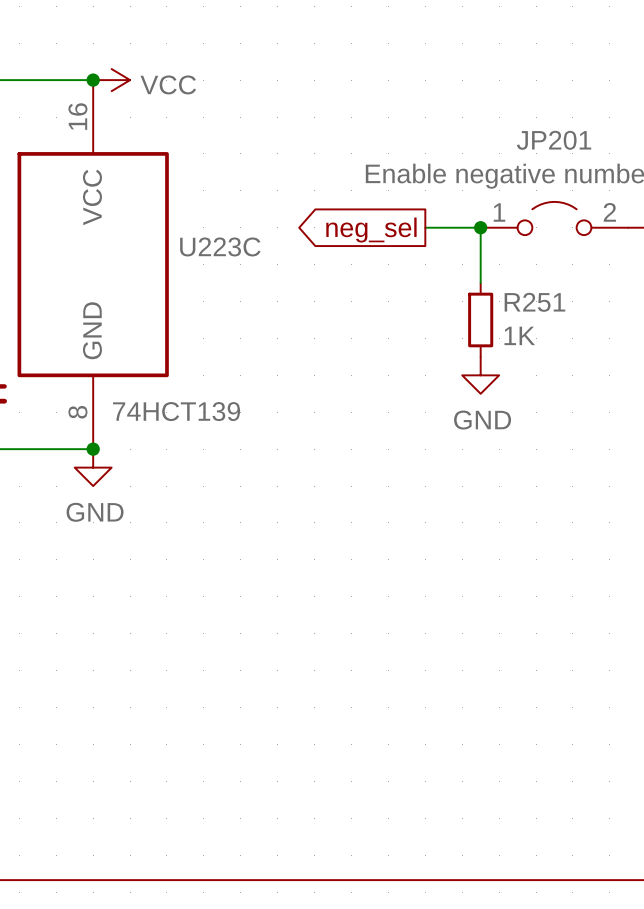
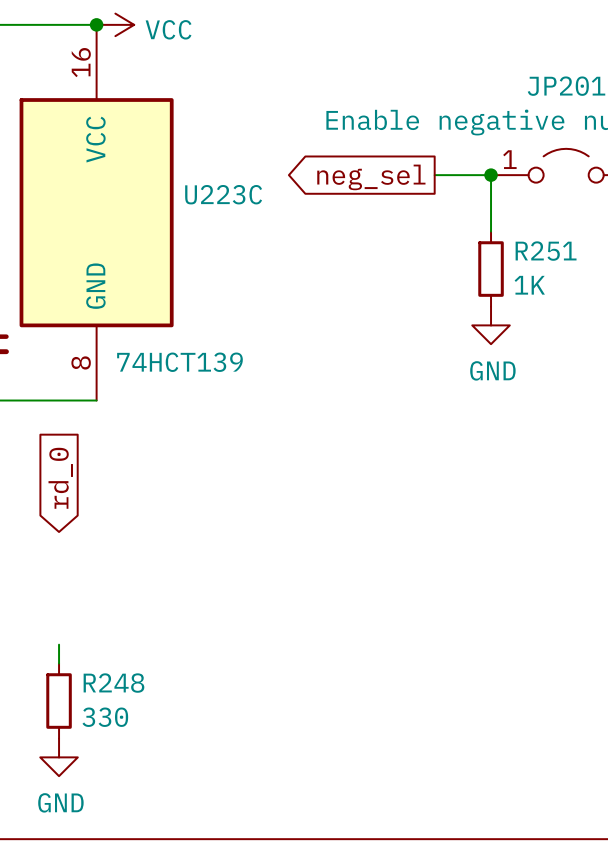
junction: (93, 449) -> none
power symbol: GND (93, 467) -> none
global label: none -> rd_0 (60, 478)
wire: none -> (59, 644) (59, 663)
R248: none -> 330 (59, 701)
power symbol: none -> GND (59, 757)

